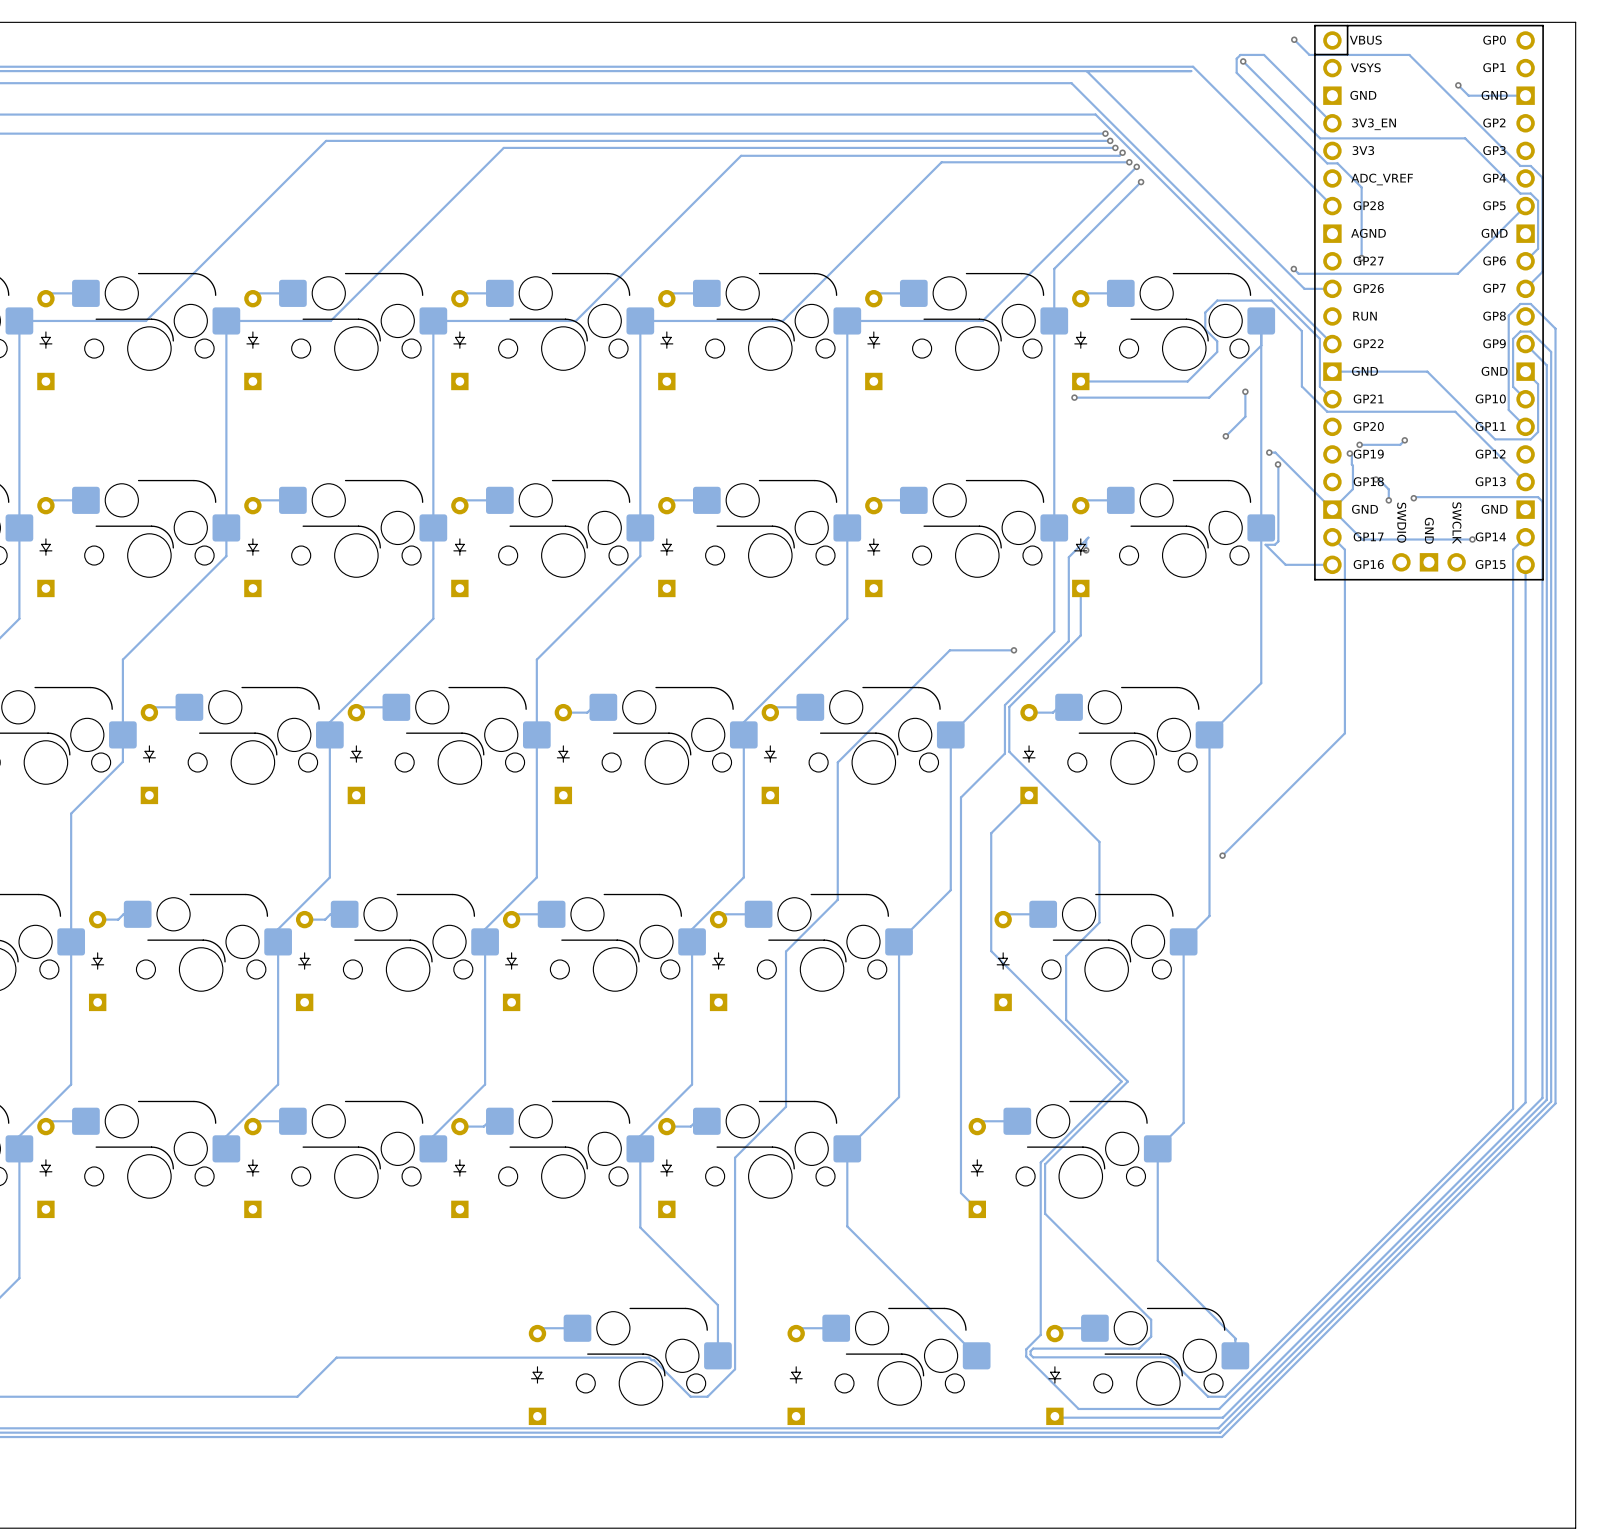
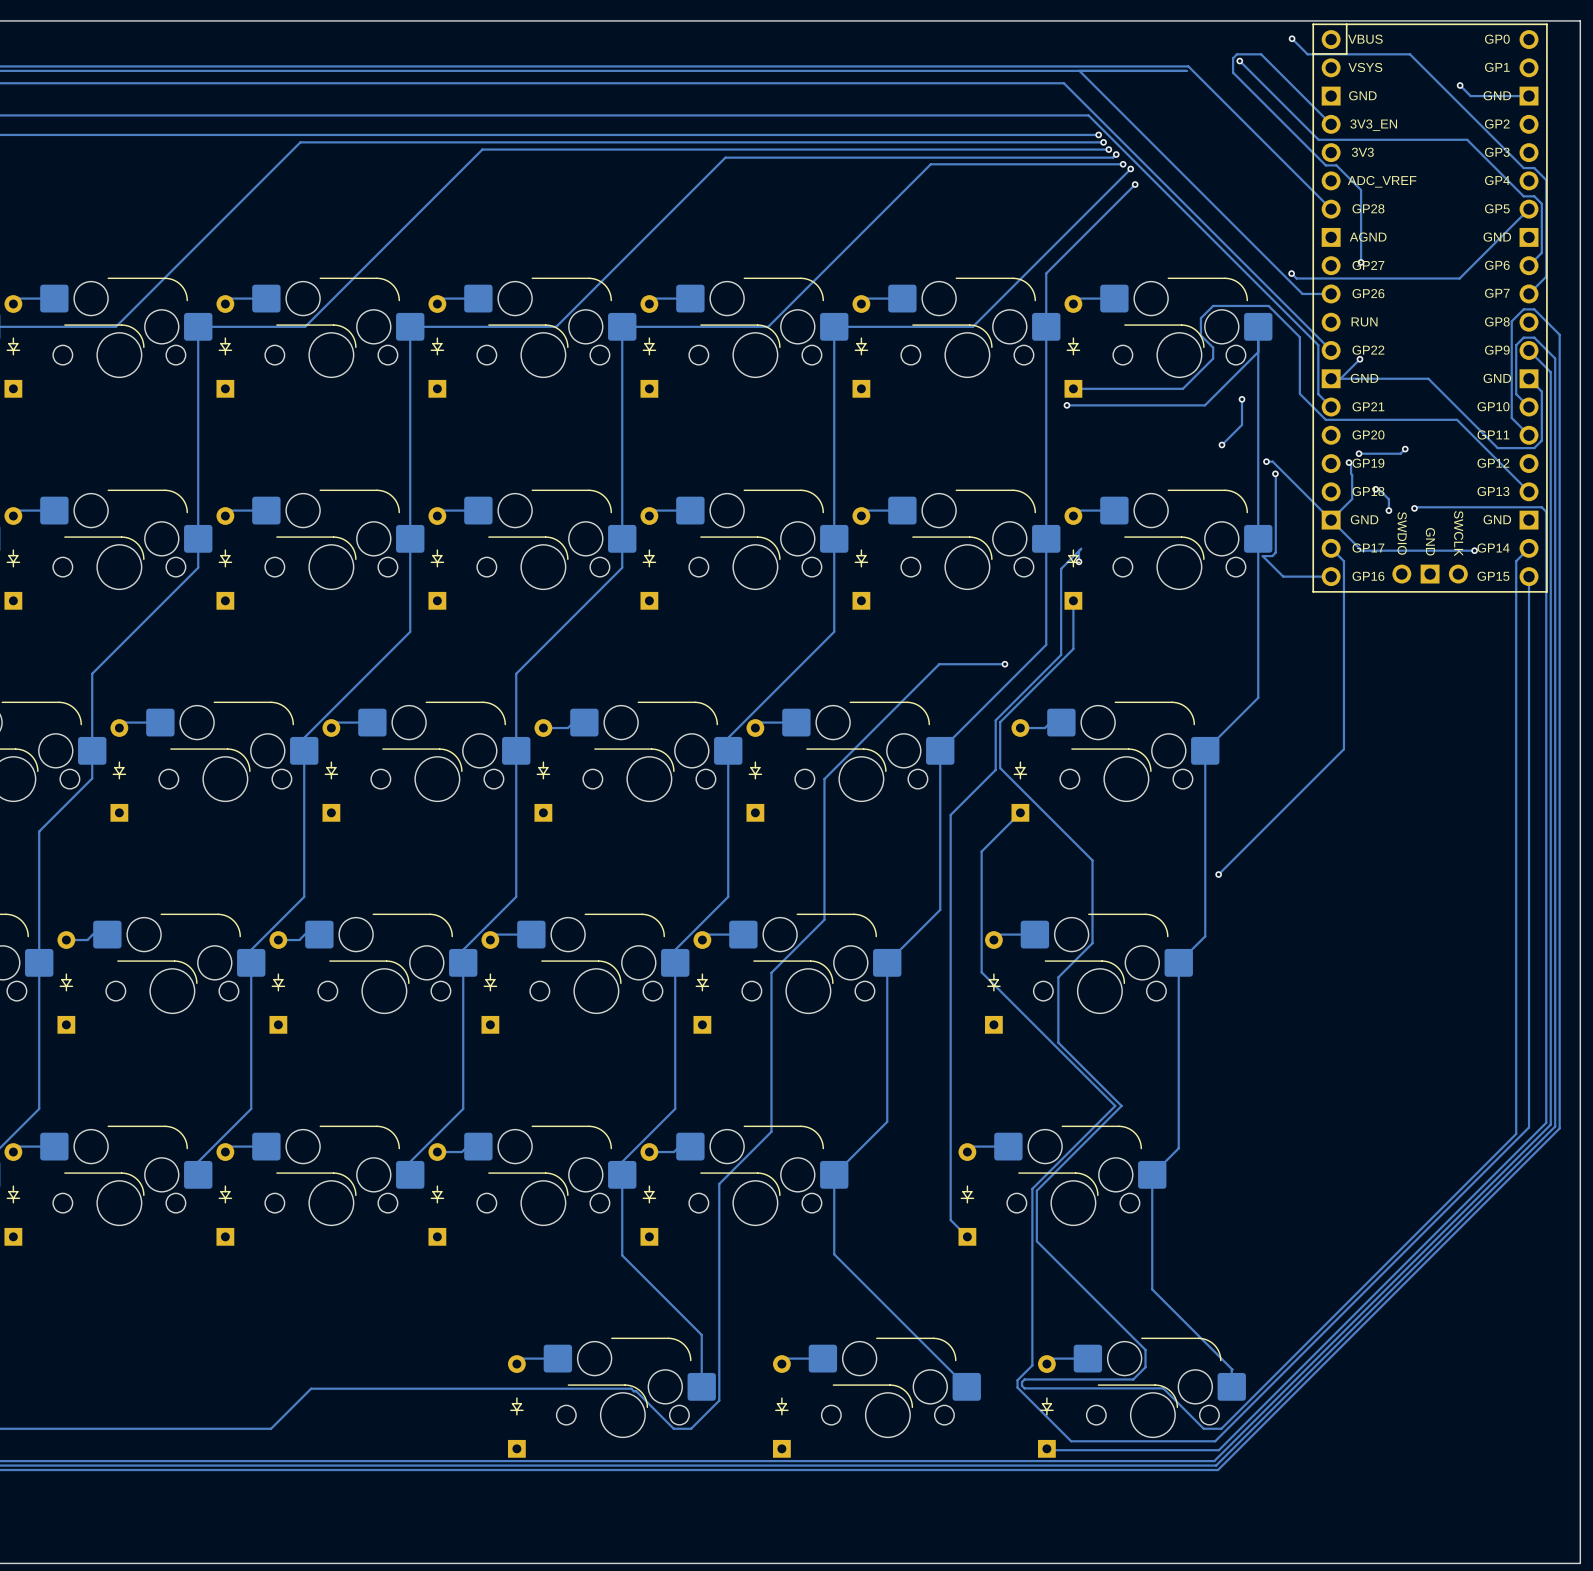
track: none -> (1359, 359) (1340, 378)
via: none -> (1359, 359)

